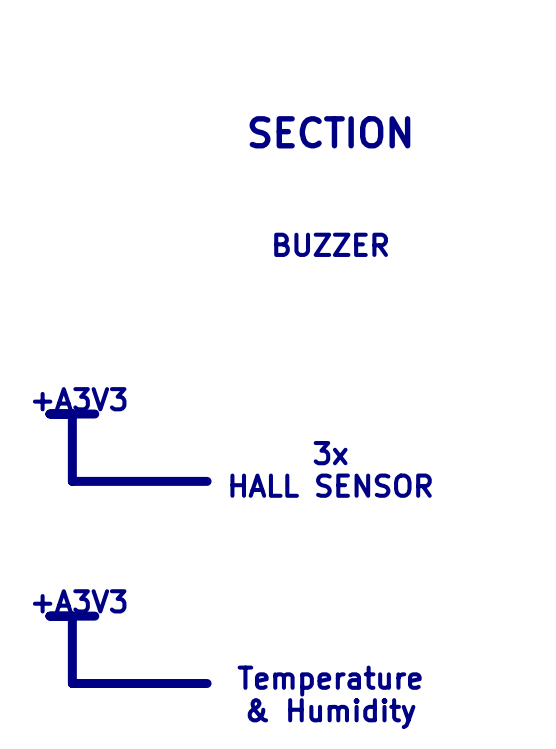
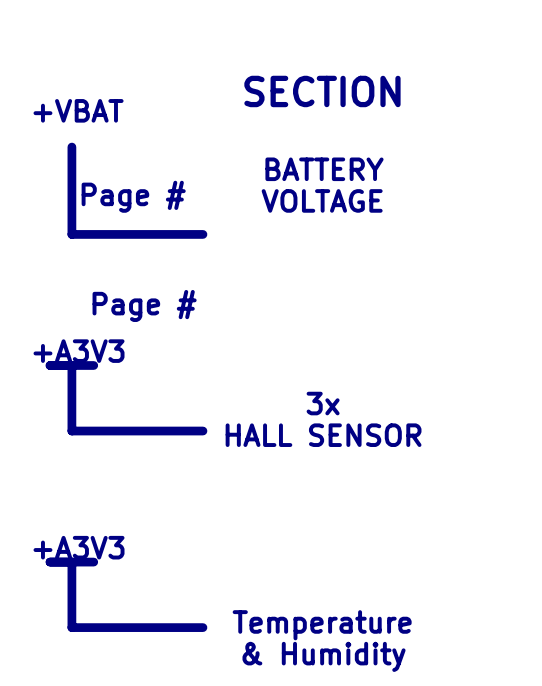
text: none -> +VBAT (78, 110)
line: none -> (71, 147) (71, 234) (202, 234)
text: none -> BATTERY (324, 169)
text: none -> Page # (133, 196)
text: BUZZER (331, 244) -> VOLTAGE (322, 200)
text: none -> Page # (144, 305)

